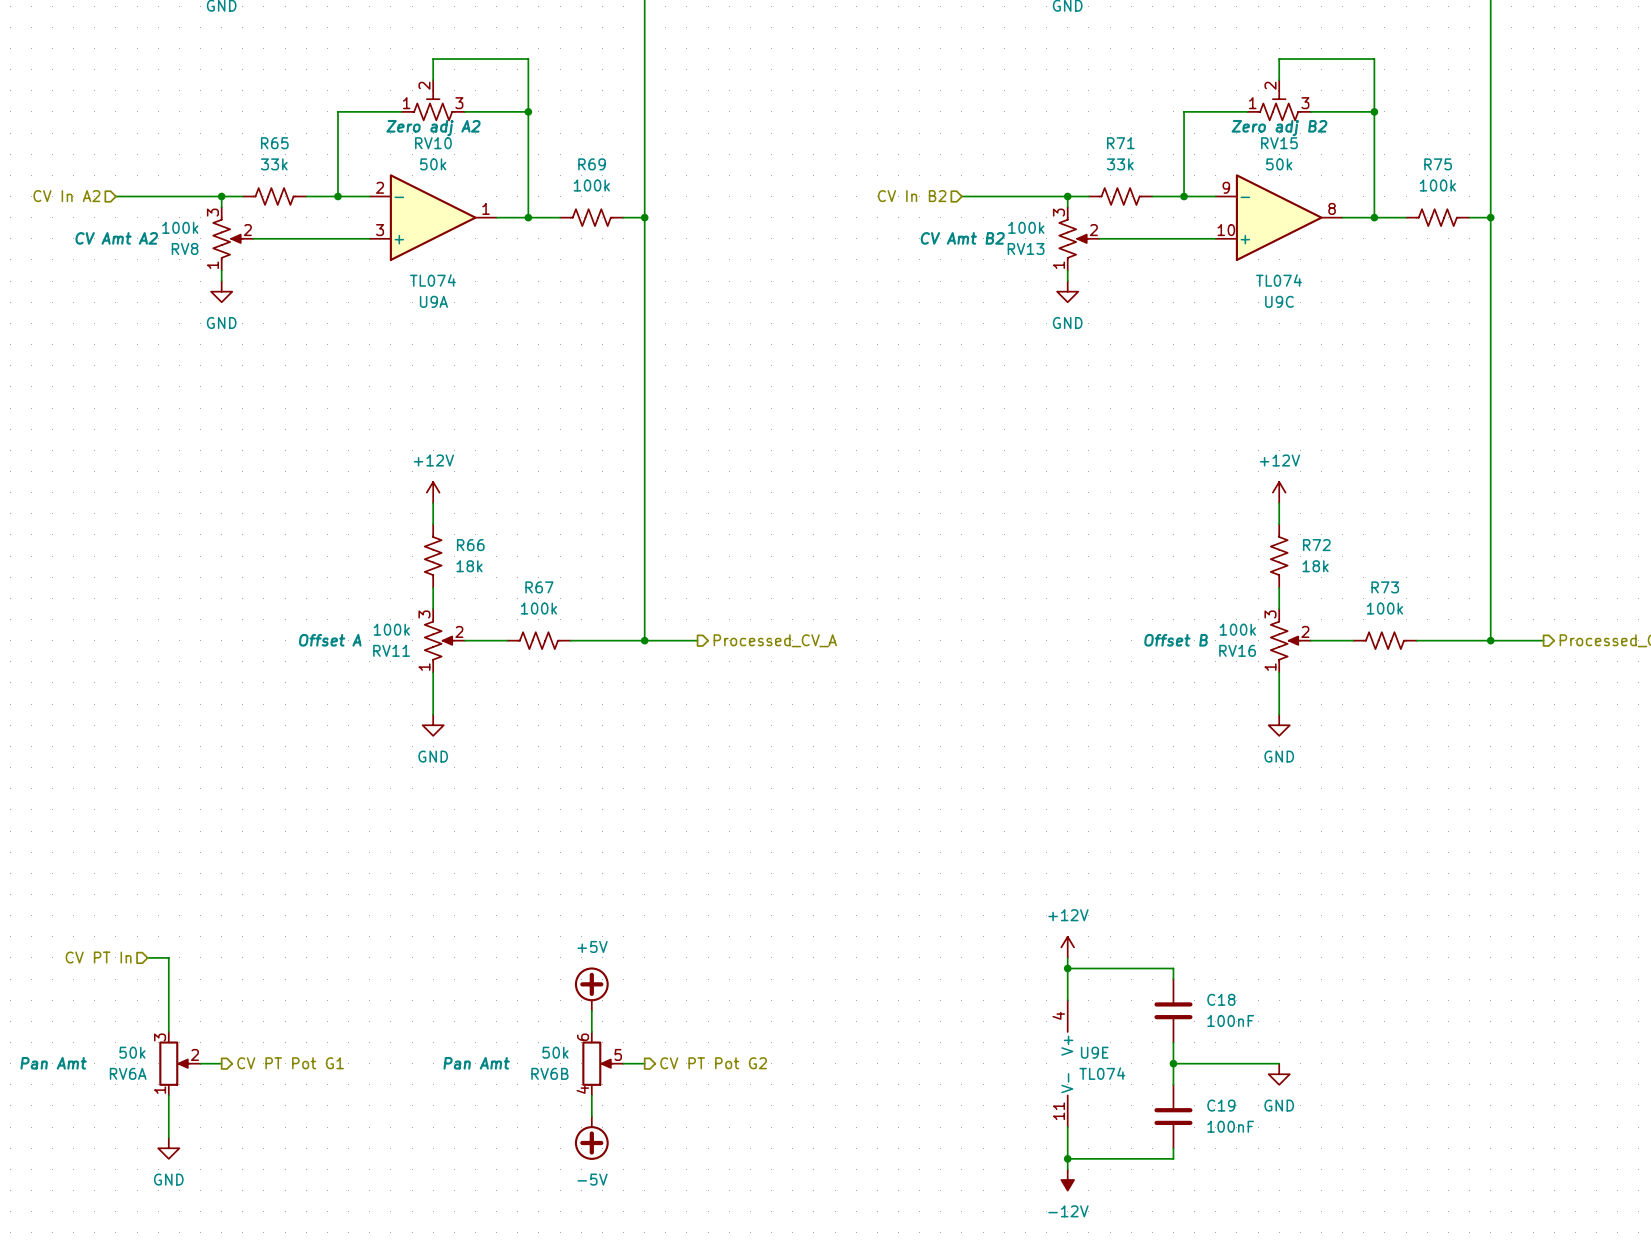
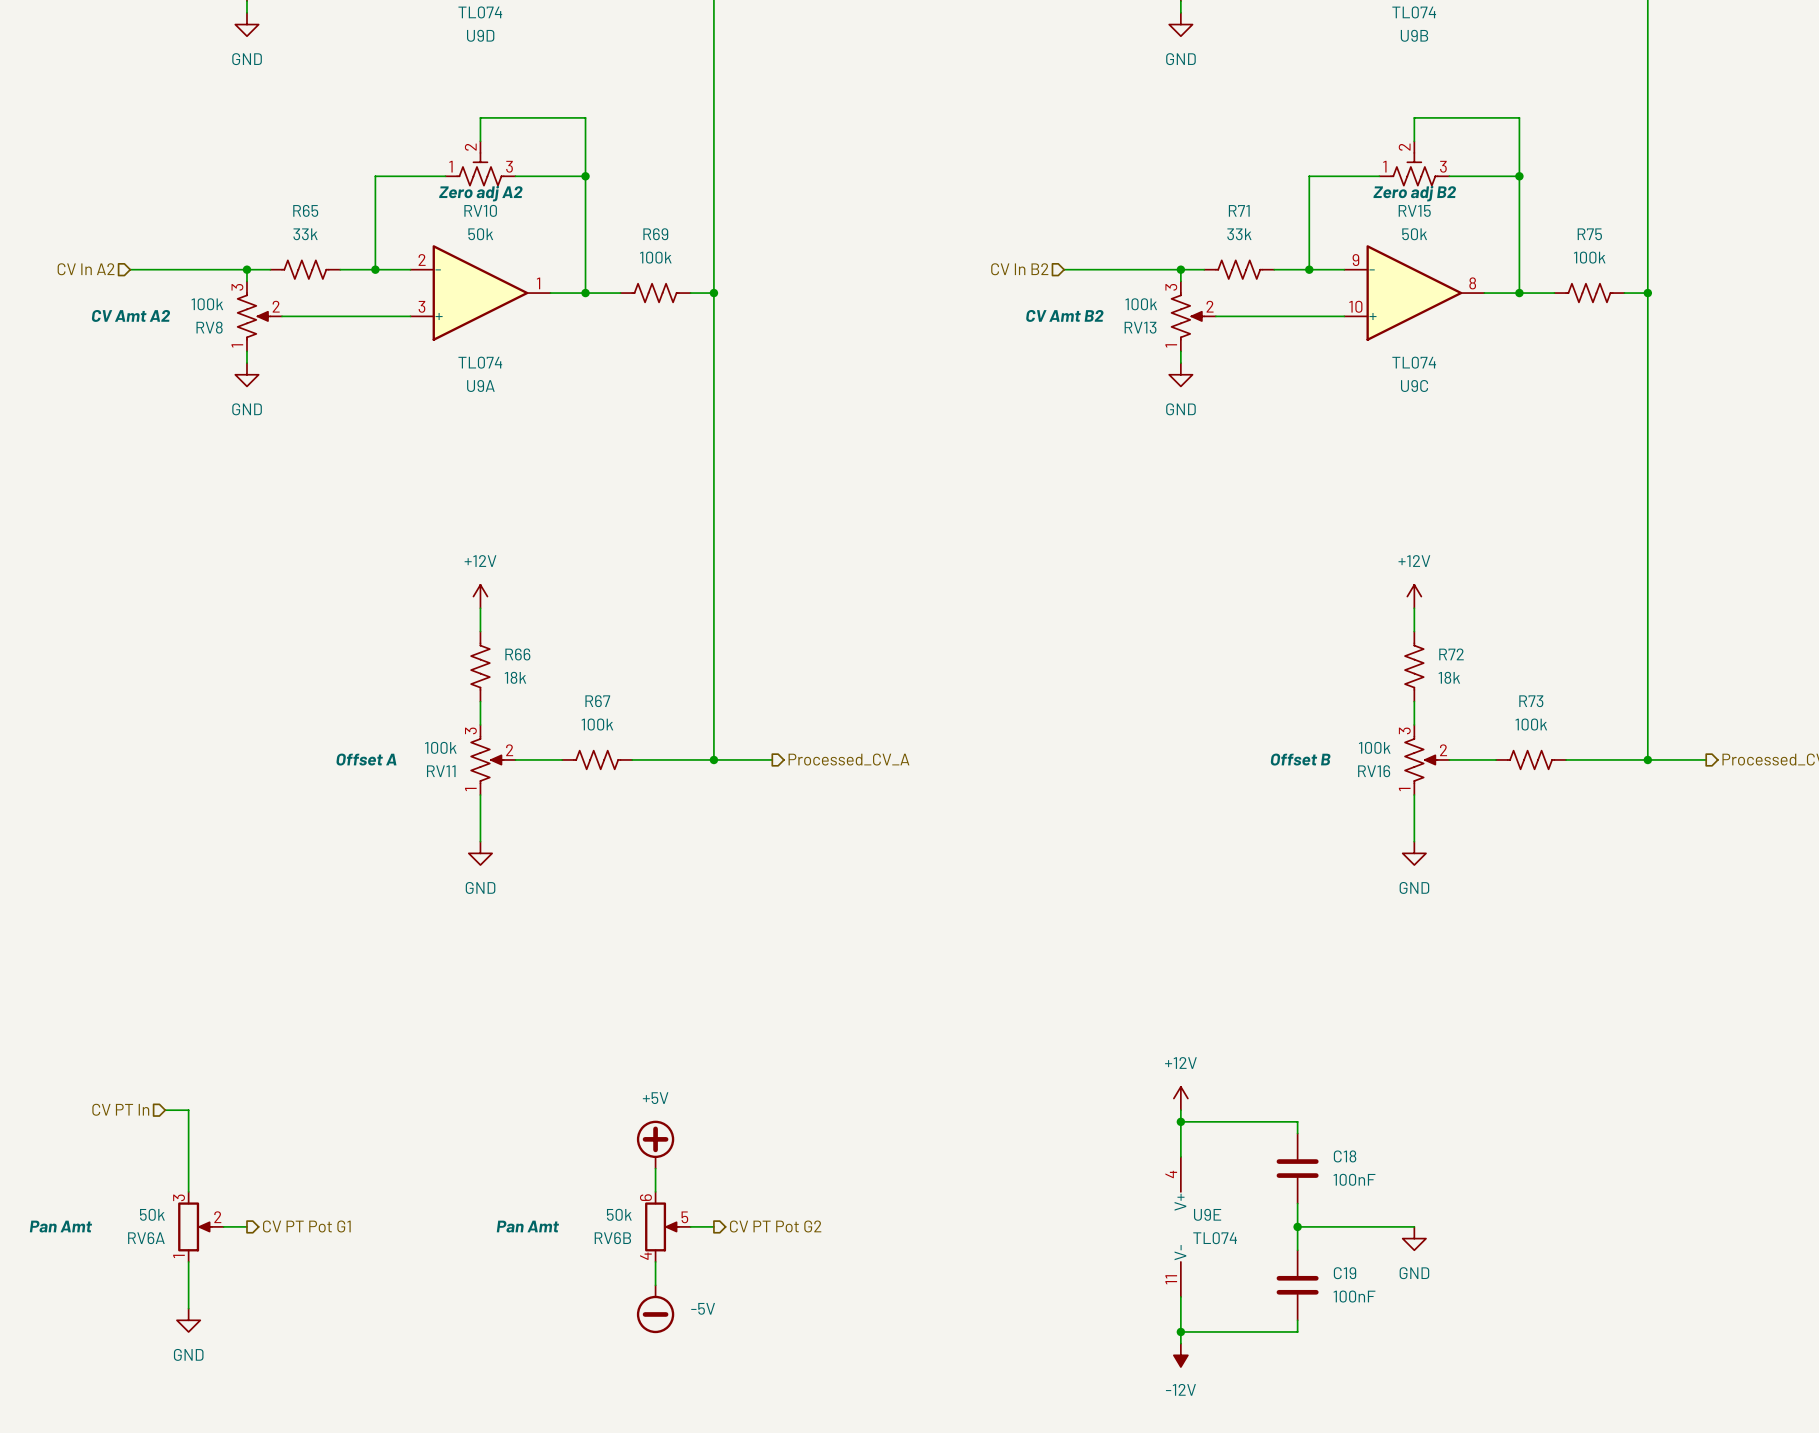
power symbol shape: [574, 1116, 609, 1160] -> [636, 1285, 675, 1334]
power symbol text position: -5V (592, 1179) -> -5V (703, 1308)

